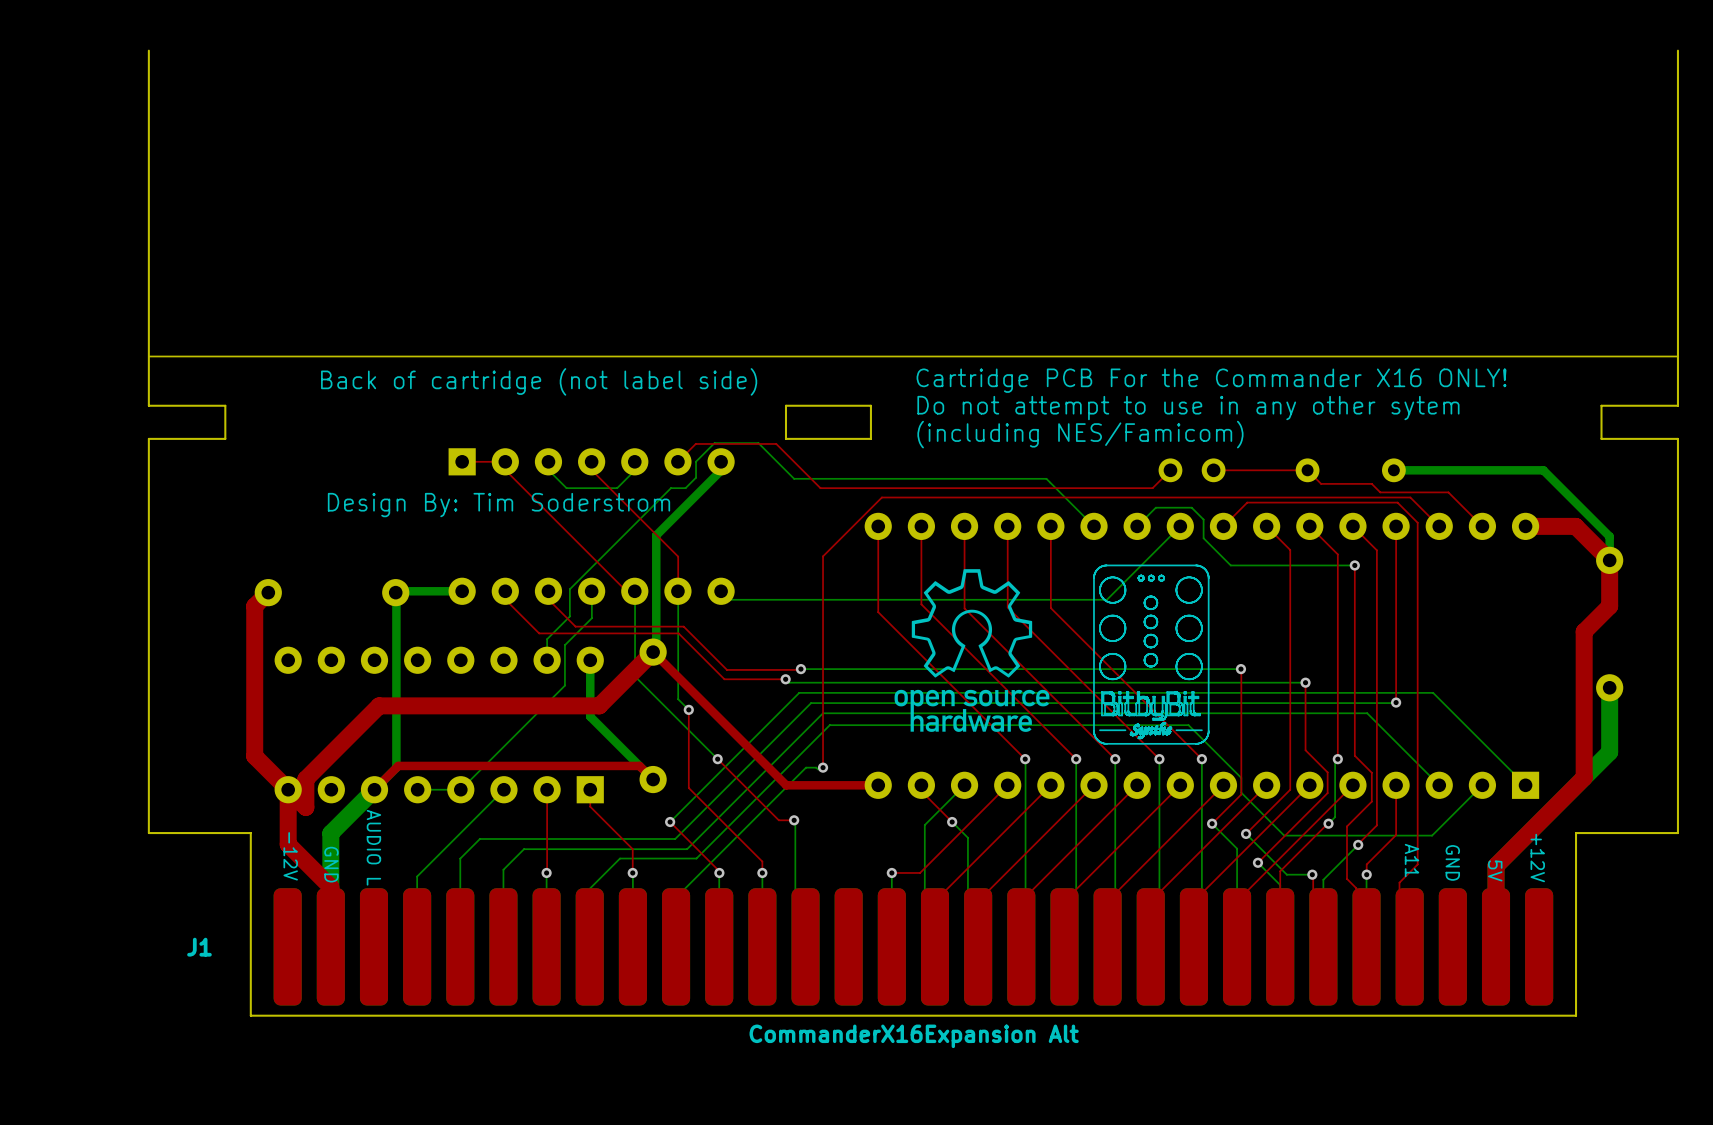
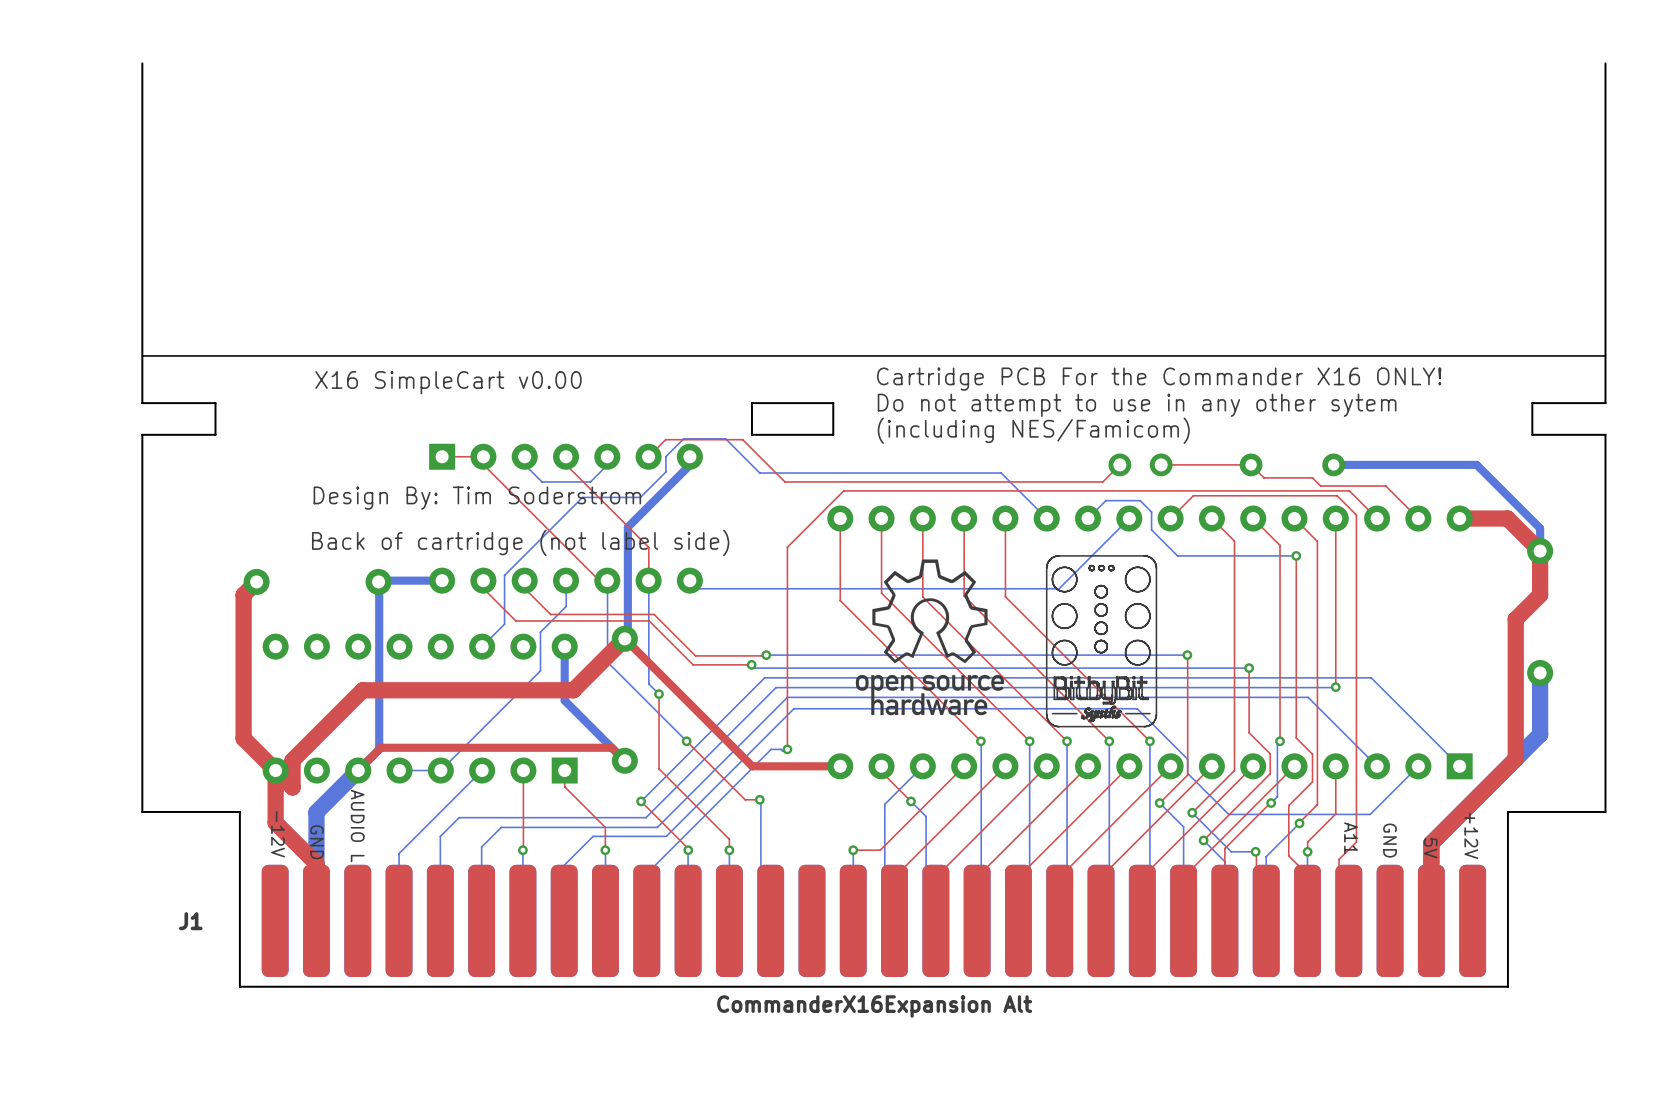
text: Back of cartridge (not label side) (539, 381) -> X16 SimpleCart v0.00 (448, 382)
bottom track: (685, 488) (670, 488) (569, 589) (569, 616) (547, 639) (547, 660) -> (655, 481) (640, 497) (582, 497) (504, 575) (504, 624) (482, 646)
text: none -> Back of cartridge (not label side) (520, 542)

